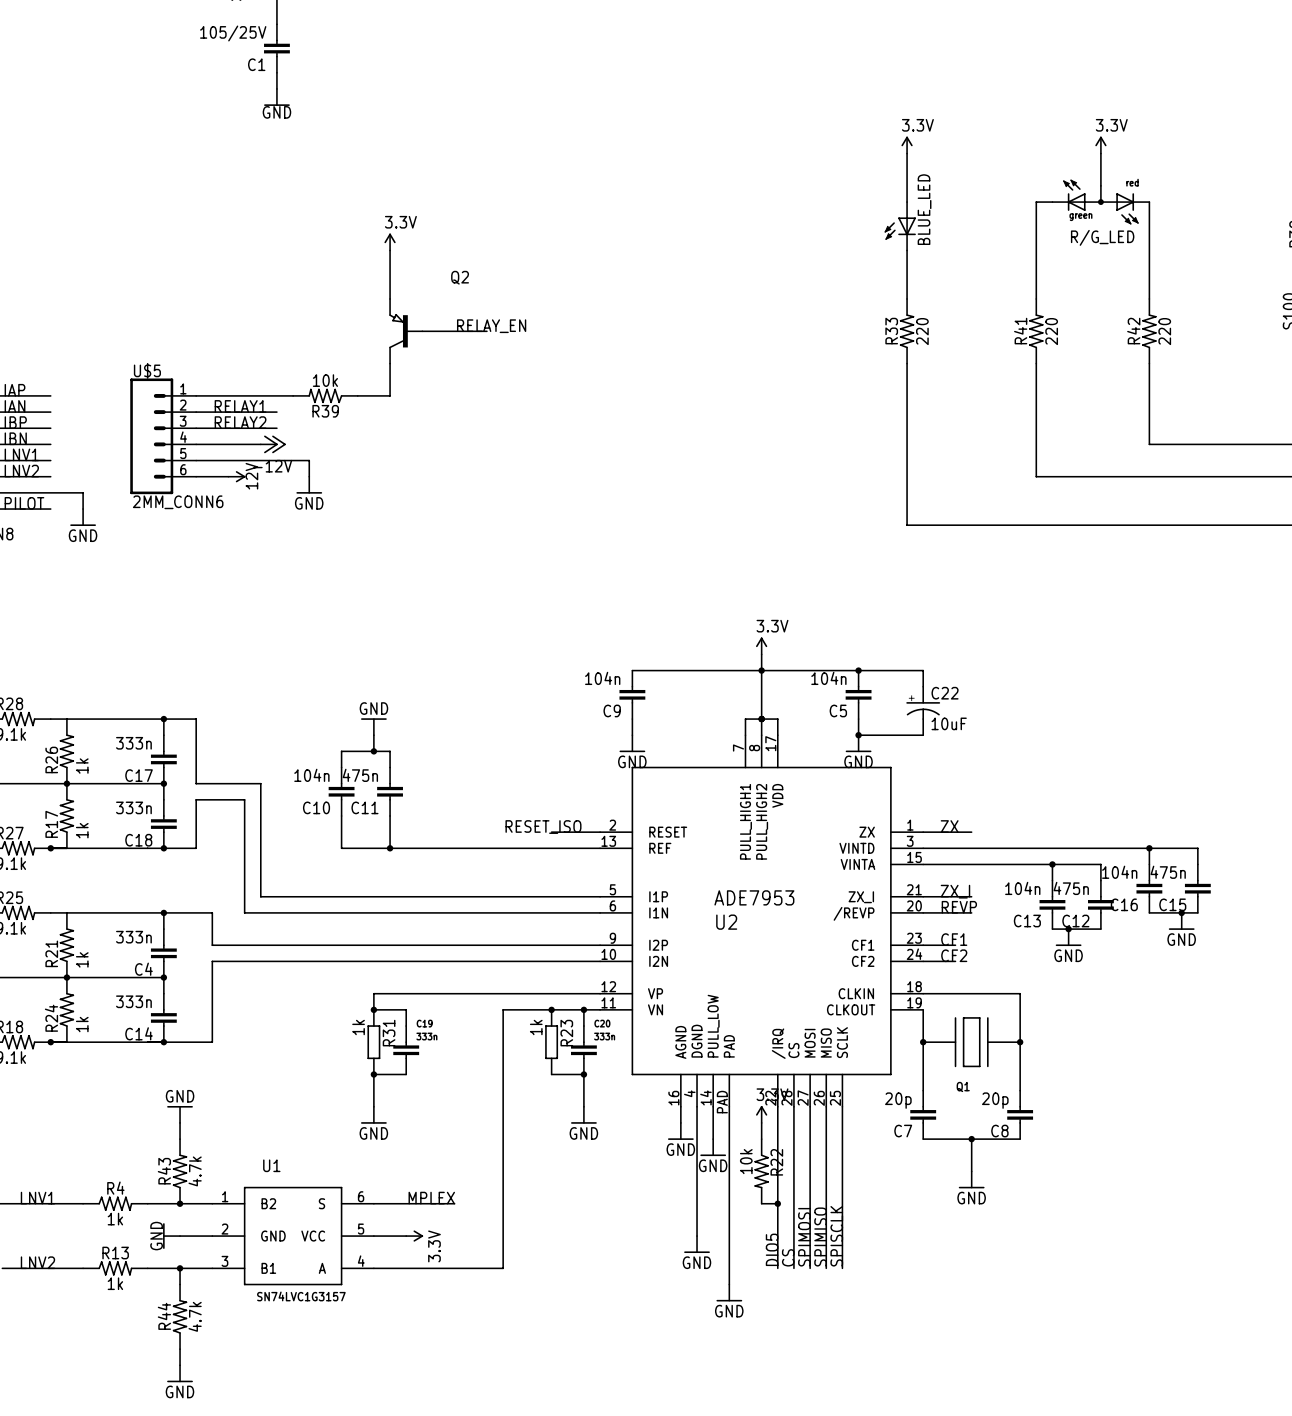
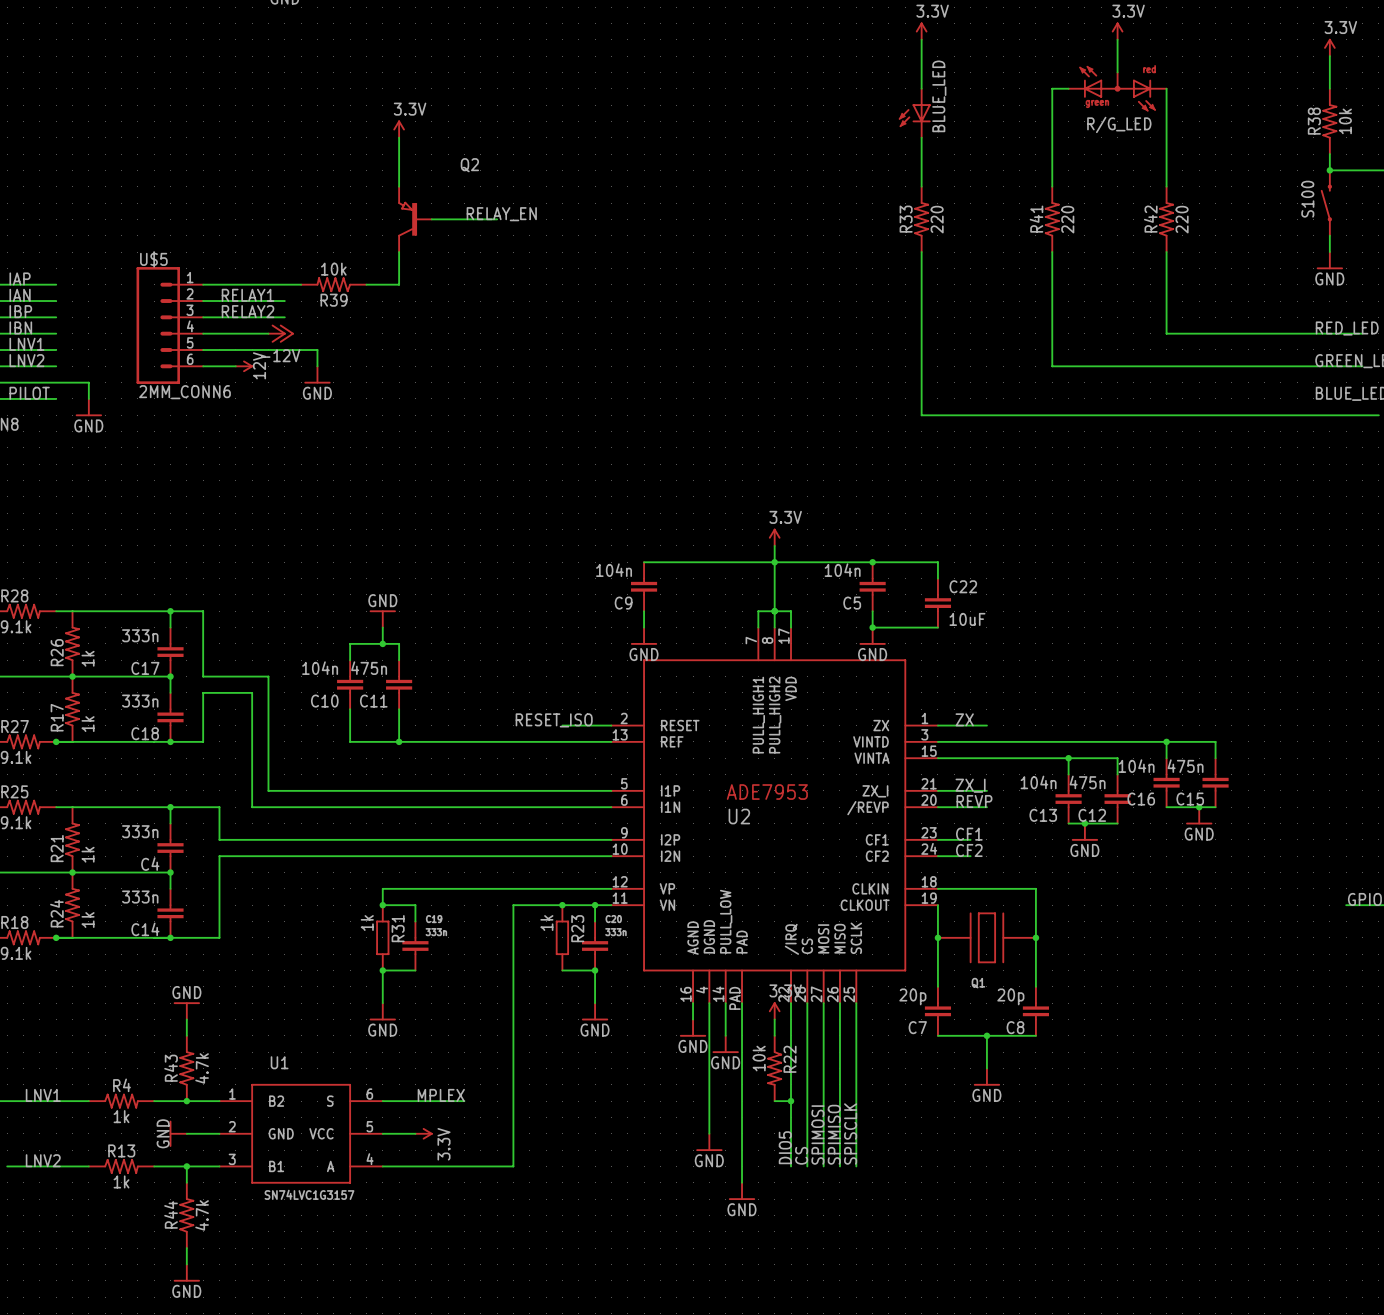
C22 symbol: [906, 686, 941, 736] -> [924, 578, 952, 628]

